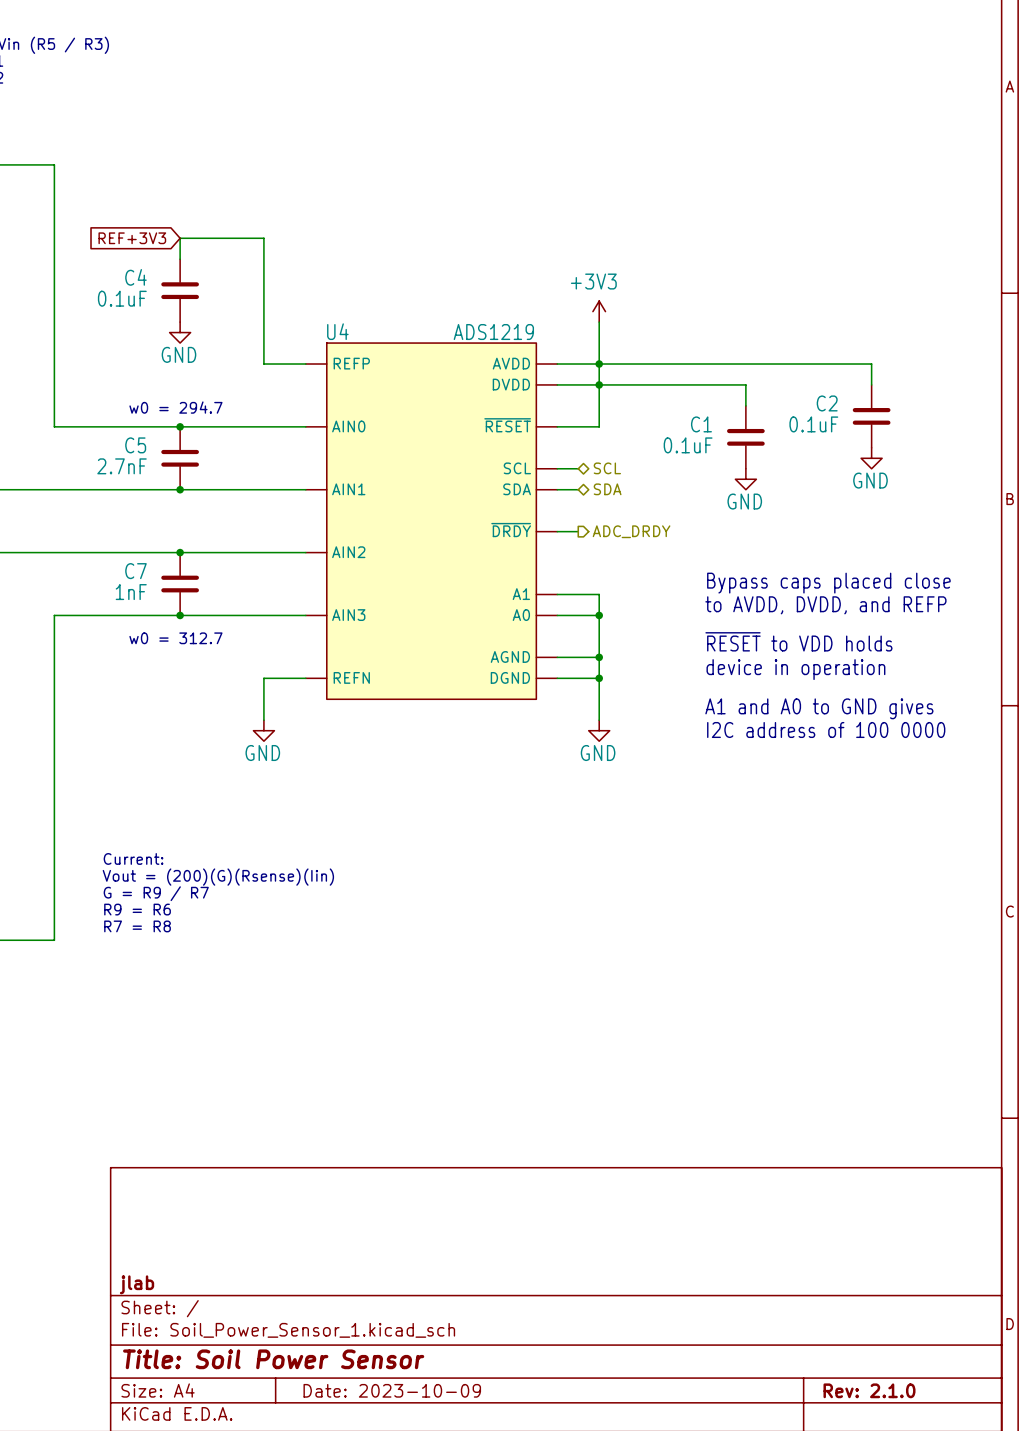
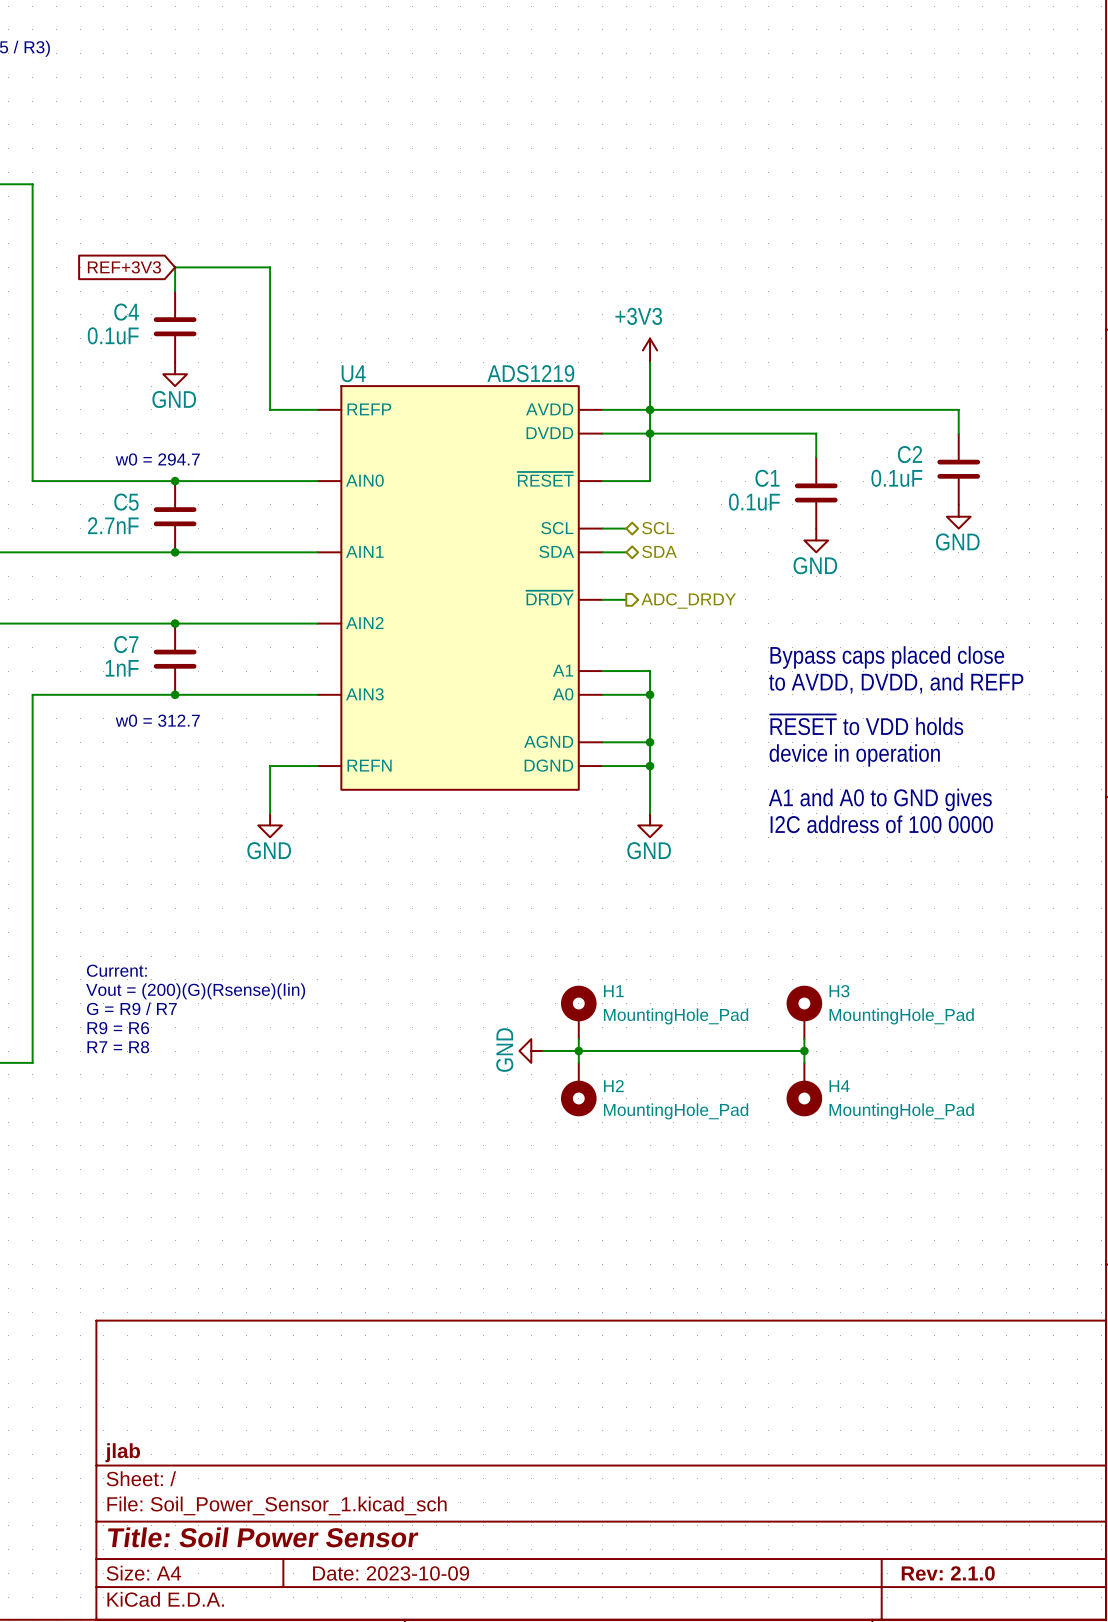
H1: none -> MountingHole_Pad (578, 1012)
H3: none -> MountingHole_Pad (804, 1012)
wire: none -> (578, 1039) (578, 1062)
wire: none -> (804, 1039) (804, 1062)
power symbol: none -> GND (531, 1051)
wire: none -> (543, 1051) (804, 1051)
junction: none -> (578, 1051)
junction: none -> (804, 1051)
H2: none -> MountingHole_Pad (578, 1089)
H4: none -> MountingHole_Pad (804, 1089)

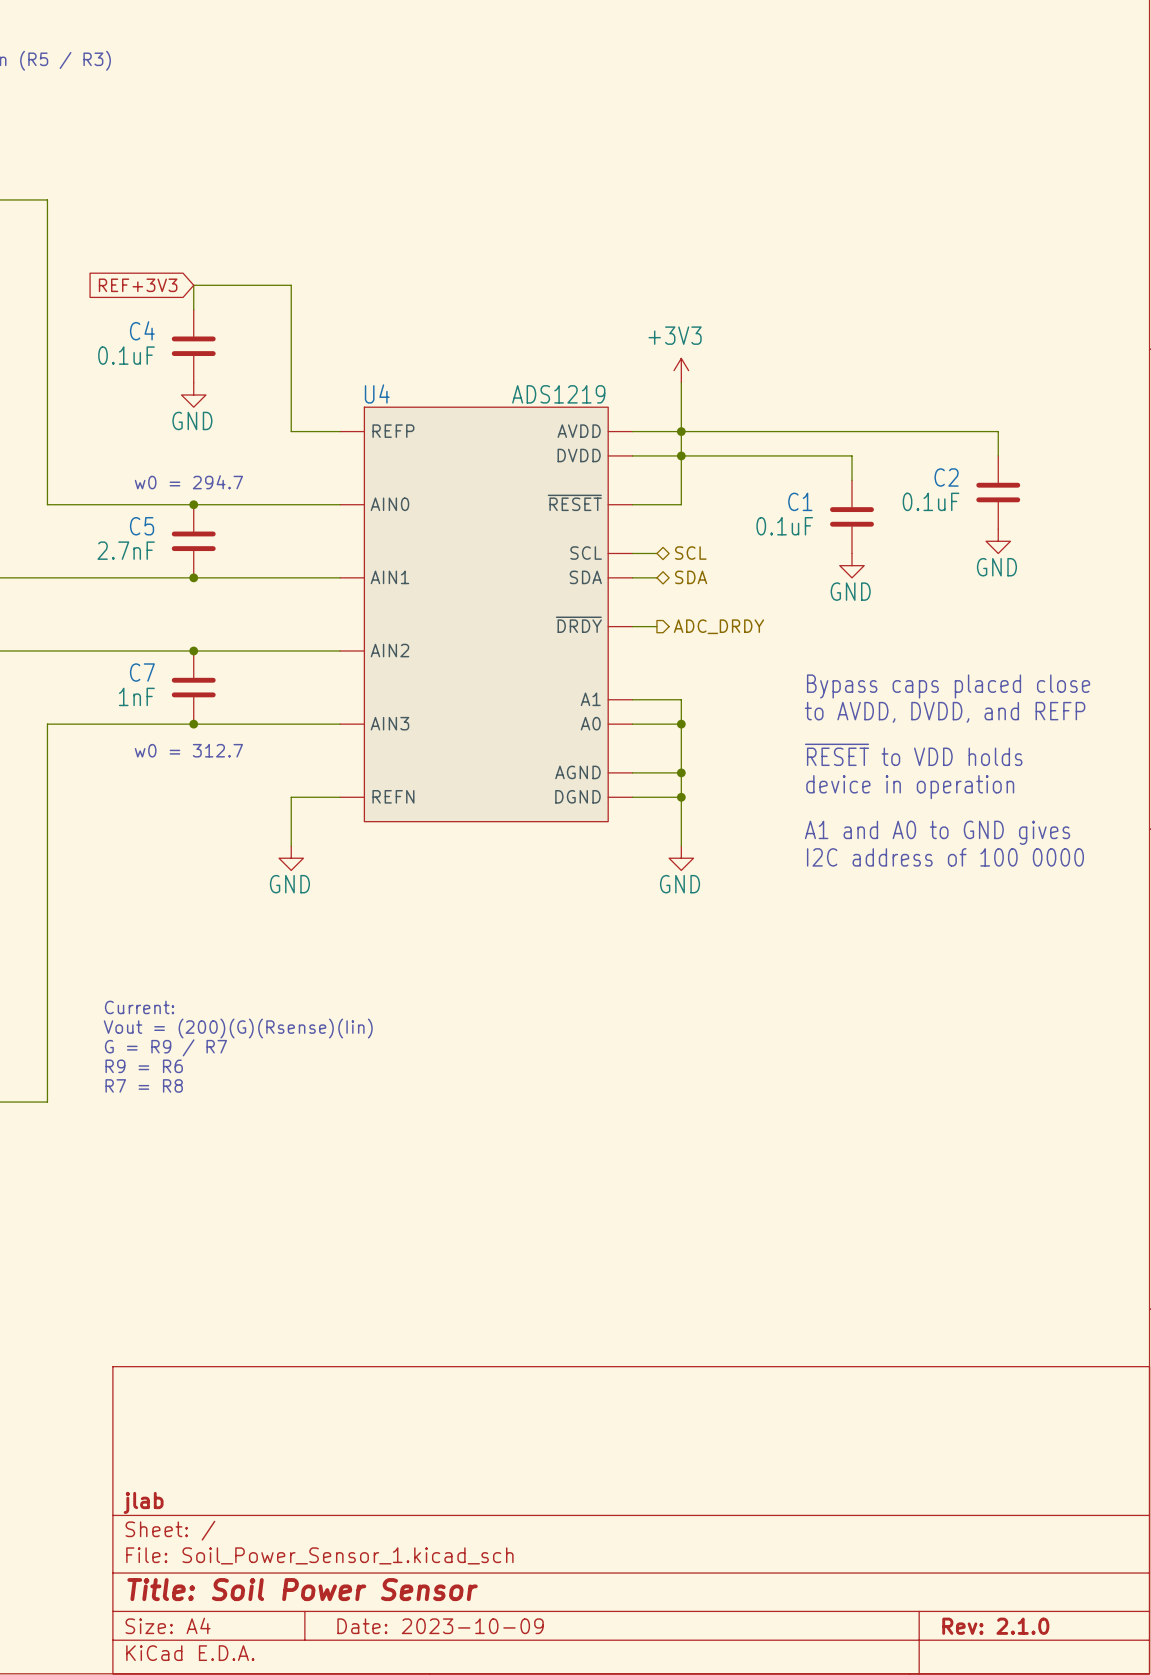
H1: MountingHole_Pad (578, 1012) -> none
H3: MountingHole_Pad (804, 1012) -> none
wire: (578, 1039) (578, 1062) -> none
wire: (804, 1039) (804, 1062) -> none
power symbol: GND (531, 1051) -> none
wire: (543, 1051) (804, 1051) -> none
junction: (578, 1051) -> none
junction: (804, 1051) -> none
H2: MountingHole_Pad (578, 1089) -> none
H4: MountingHole_Pad (804, 1089) -> none

